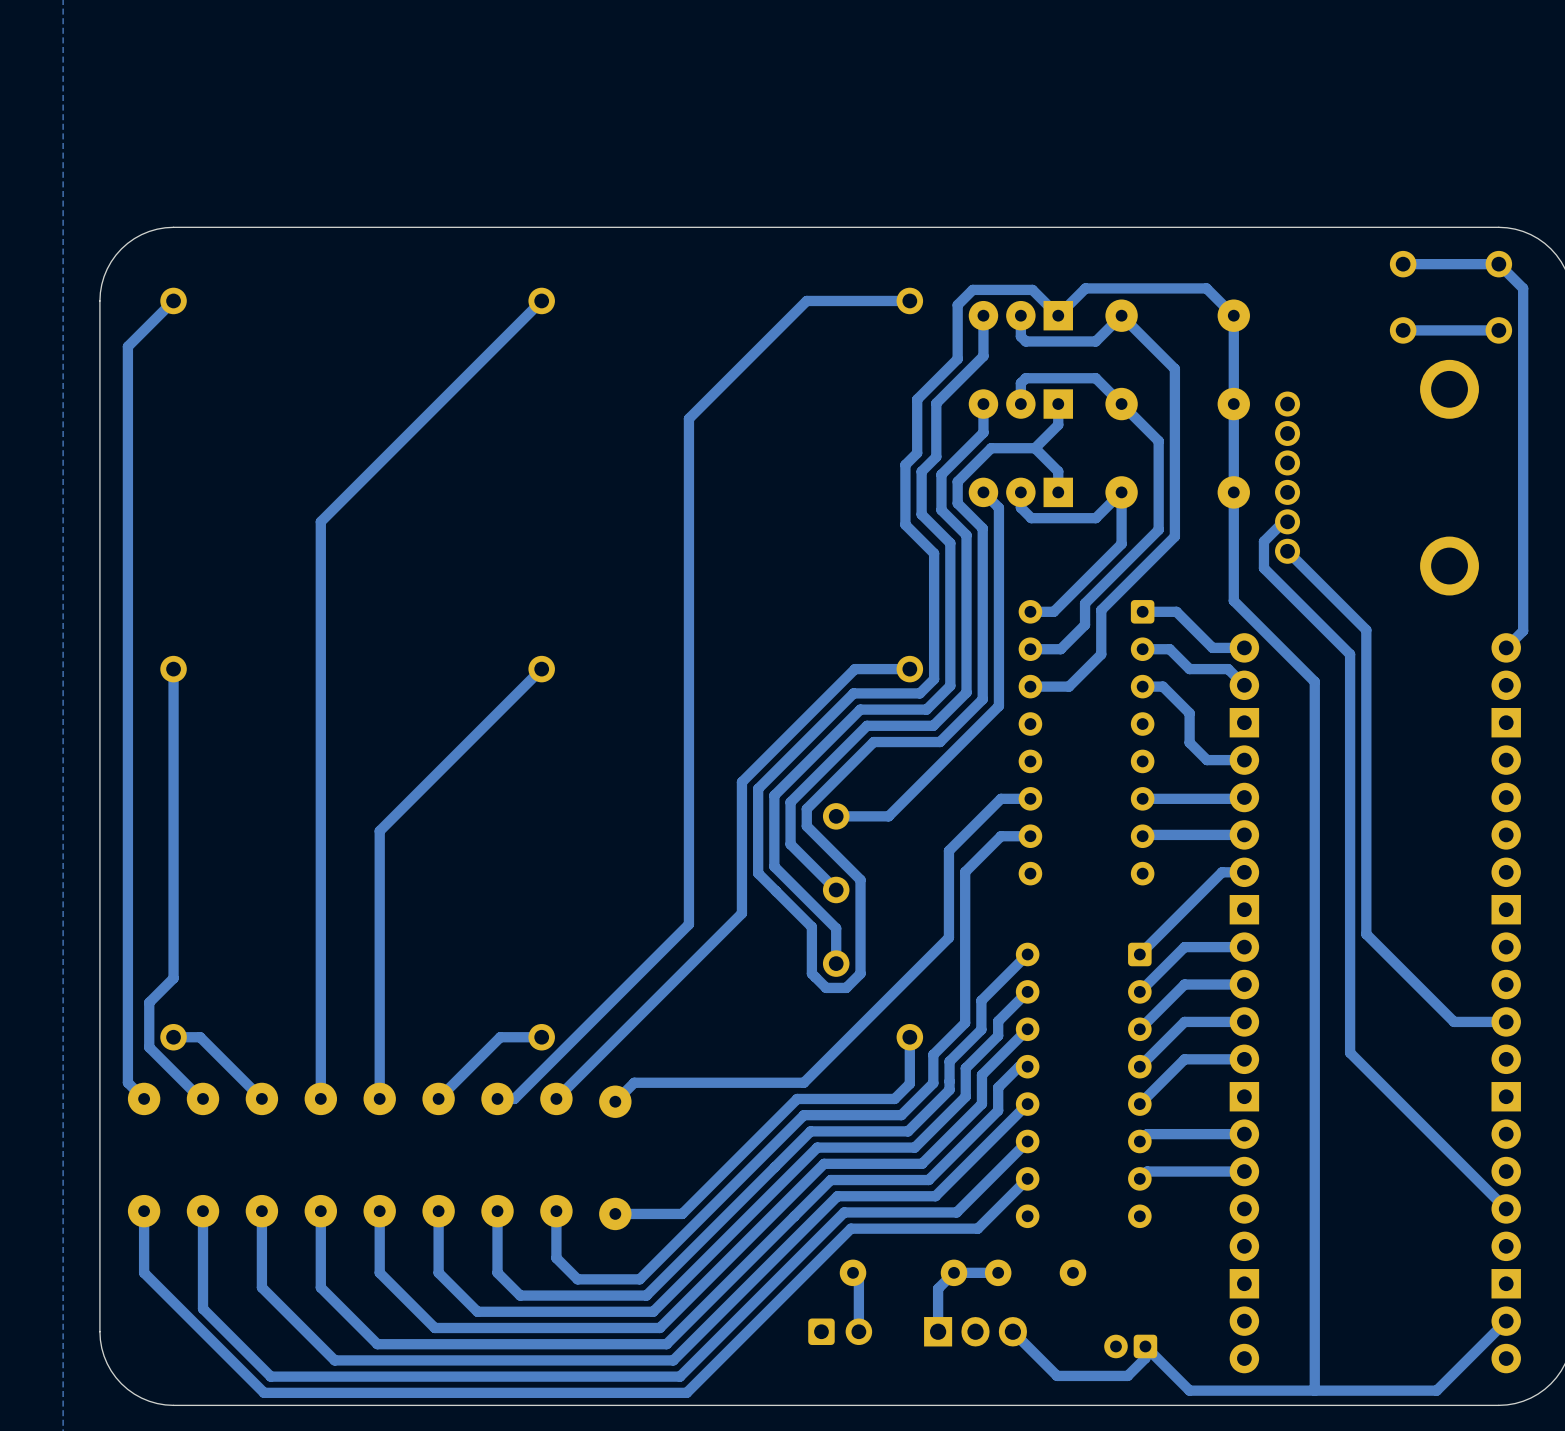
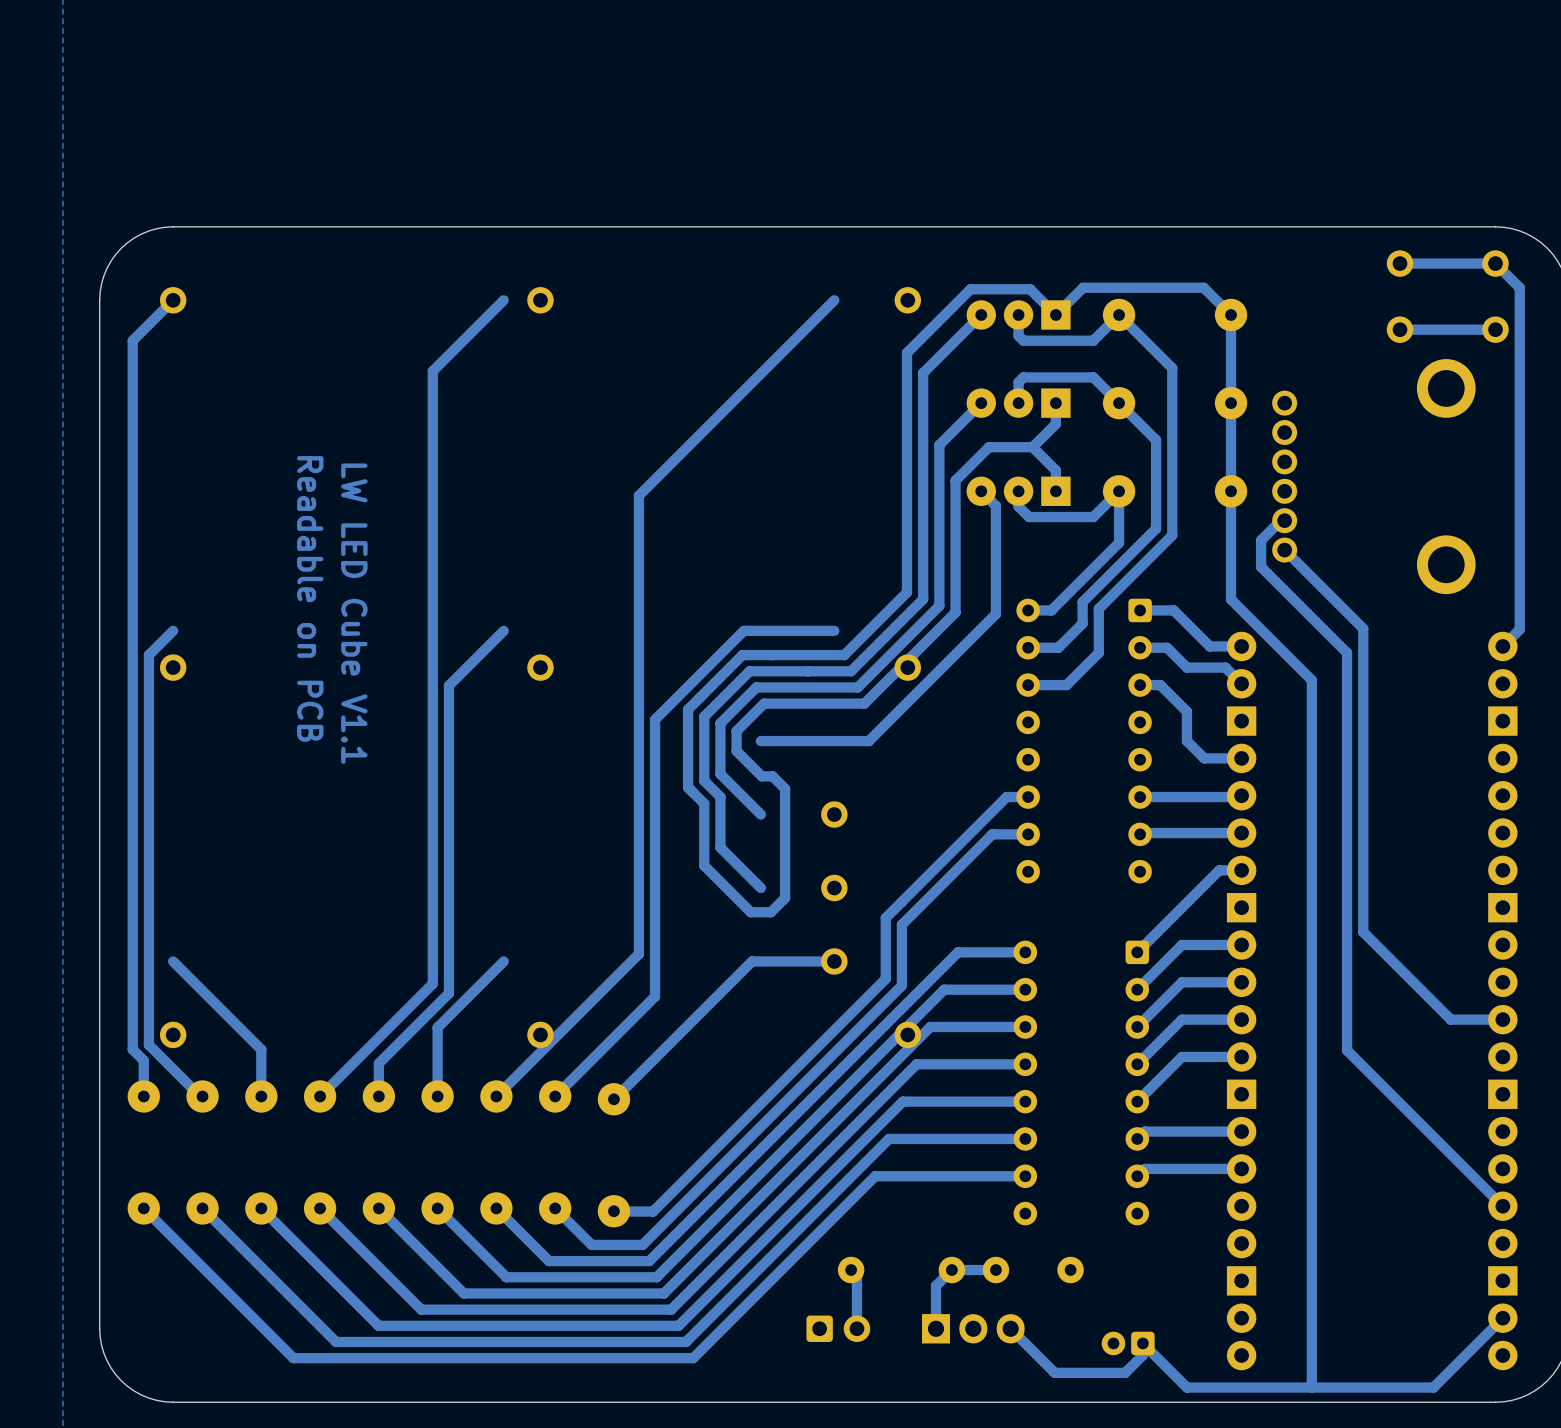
bottom track: (541, 300) (320, 521) (320, 1098) -> (503, 300) (432, 371) (432, 983) (320, 1096)
bottom track: (909, 300) (806, 300) (688, 418) (688, 924) (514, 1098) (497, 1098) -> (834, 300) (638, 495) (638, 953) (496, 1096)
bottom track: (957, 305) (957, 359) (917, 399) (917, 453) (905, 464) (905, 524) (934, 553) (934, 679) (919, 693) (853, 693) (758, 788) (758, 873) (811, 927) (811, 973) (826, 987) (846, 987) (860, 973) (860, 879) (806, 826) (806, 809) (873, 742) (940, 742) (982, 699) (982, 528) (957, 503) -> (955, 304) (907, 352) (907, 592) (844, 655) (742, 655) (688, 709) (688, 787) (704, 803) (704, 865) (750, 912) (770, 912) (785, 898) (785, 788) (772, 776) (761, 776) (736, 751) (736, 731) (764, 703) (864, 703) (955, 612) (955, 502)
bottom track: (983, 315) (983, 356) (936, 403) (936, 456) (921, 471) (921, 514) (950, 543) (950, 685) (926, 709) (860, 709) (774, 795) (774, 866) (836, 928) (836, 963) -> (981, 314) (923, 373) (923, 599) (851, 671) (749, 671) (704, 716) (704, 780) (720, 796) (720, 847) (760, 887)
bottom track: (133, 341) (127, 346) (127, 1082) (144, 1098) -> (132, 340) (132, 1049) (143, 1060) (143, 1096)
bottom track: (983, 404) (983, 432) (941, 474) -> (981, 403) (939, 445) (939, 473)
bottom track: (998, 507) (998, 706) (888, 816) (836, 816) -> (995, 505) (995, 614) (868, 741) (760, 741)
bottom track: (941, 510) (966, 535) (966, 692) (933, 725) (867, 725) (790, 802) (790, 844) (836, 889) -> (939, 509) (939, 605) (857, 687) (756, 687) (720, 723) (720, 774) (760, 814)
text: none -> Readable on PCB (310, 598)
text: none -> LW LED Cube V1.1 (354, 613)
bottom track: (173, 669) (173, 978) (149, 1002) -> (173, 630) (148, 655) (148, 1000)
bottom track: (541, 669) (379, 831) (379, 1065) -> (503, 630) (448, 685) (448, 993) (378, 1063)
bottom track: (909, 669) (854, 669) (741, 782) (741, 913) (656, 998) -> (834, 630) (743, 630) (655, 719) (655, 996)
bottom track: (1008, 798) (1000, 798) (948, 850) (948, 937) (803, 1082) (634, 1082) (615, 1101) -> (1006, 797) (885, 918) (885, 978) (653, 1211) (613, 1211)
bottom track: (1000, 836) (965, 872) (965, 1022) (933, 1054) (933, 1083) (901, 1115) (803, 1115) (639, 1279) (577, 1279) (556, 1258) (556, 1211) -> (998, 834) (992, 834) (901, 924) (901, 985) (642, 1244) (591, 1244) (555, 1208)
bottom track: (1027, 954) (981, 1000) (981, 1029) (949, 1061) (949, 1089) (908, 1131) (810, 1131) (646, 1295) (520, 1295) (497, 1272) (497, 1211) -> (1025, 952) (958, 952) (649, 1261) (549, 1261) (496, 1208)
bottom track: none -> (834, 961) (752, 961) (613, 1099)
bottom track: (1027, 991) (998, 1021) (998, 1035) (965, 1068) (965, 1096) (914, 1147) (817, 1147) (653, 1311) (477, 1311) (438, 1272) (438, 1211) -> (1025, 989) (944, 989) (656, 1277) (506, 1277) (437, 1208)
bottom track: (1027, 1029) (981, 1074) (981, 1103) (922, 1163) (824, 1163) (659, 1327) (434, 1327) (379, 1272) (379, 1211) -> (1025, 1026) (930, 1026) (663, 1293) (463, 1293) (378, 1208)
bottom track: (173, 1037) (200, 1037) (261, 1098) -> (173, 961) (261, 1049) (261, 1096)
bottom track: (541, 1037) (500, 1037) (438, 1098) -> (503, 961) (437, 1027) (437, 1096)
bottom track: (909, 1037) (909, 1083) (894, 1098) (797, 1098) (682, 1213) (615, 1213) -> none
bottom track: (1019, 1066) (998, 1087) (998, 1110) (928, 1180) (830, 1180) (666, 1344) (377, 1344) (320, 1287) (320, 1211) -> (1016, 1064) (916, 1064) (671, 1309) (421, 1309) (320, 1208)
bottom track: (1027, 1104) (935, 1196) (837, 1196) (673, 1360) (334, 1360) (261, 1287) (261, 1211) -> (1025, 1101) (902, 1101) (678, 1325) (378, 1325) (261, 1208)
bottom track: (1027, 1141) (956, 1212) (844, 1212) (680, 1376) (270, 1376) (203, 1308) (203, 1211) -> (1025, 1138) (888, 1138) (685, 1341) (336, 1341) (202, 1208)
bottom track: (1027, 1178) (977, 1228) (850, 1228) (686, 1392) (264, 1392) (144, 1272) (144, 1211) -> (1025, 1176) (875, 1176) (693, 1358) (293, 1358) (143, 1208)

